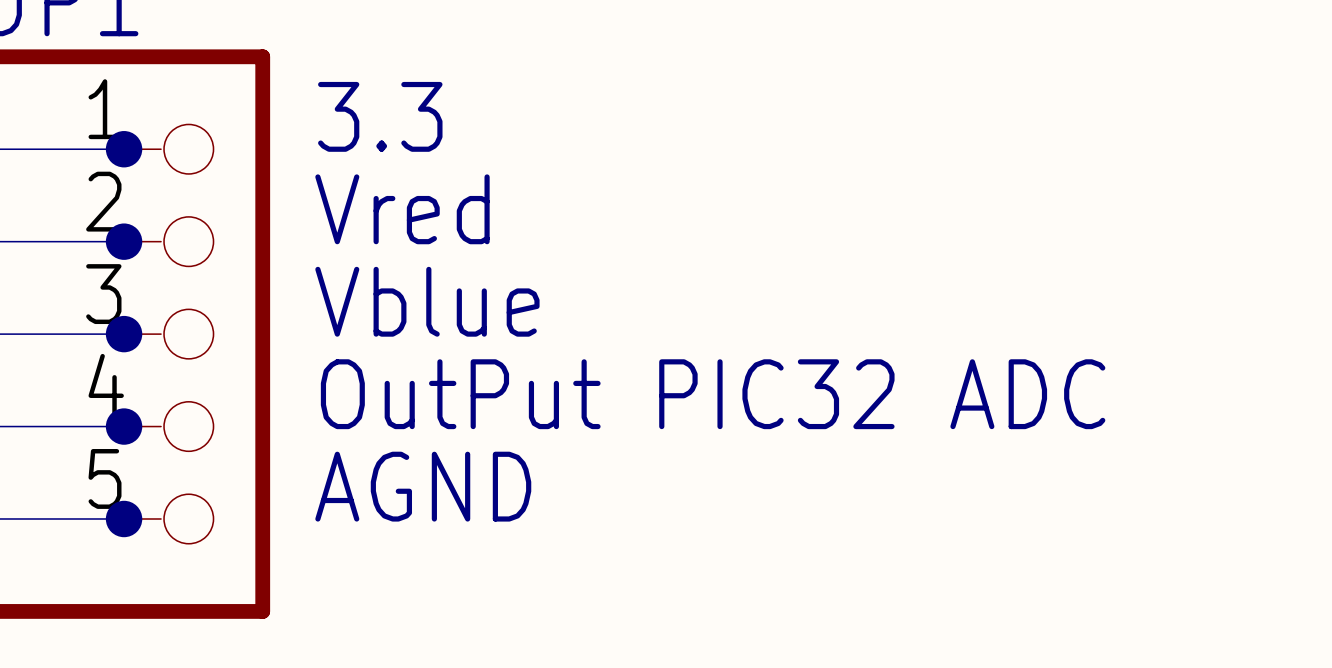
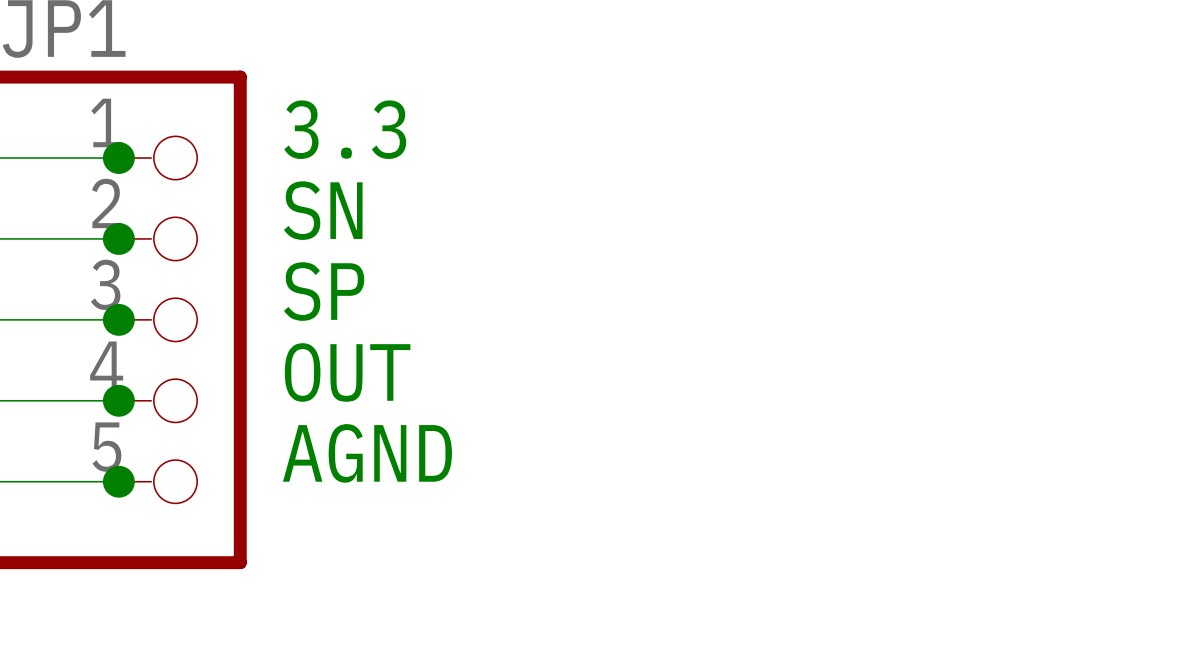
text: Vred (402, 209) -> SN (323, 210)
text: Vblue (427, 301) -> SP (324, 291)
text: OutPut PIC32 ADC (713, 394) -> OUT (347, 372)

